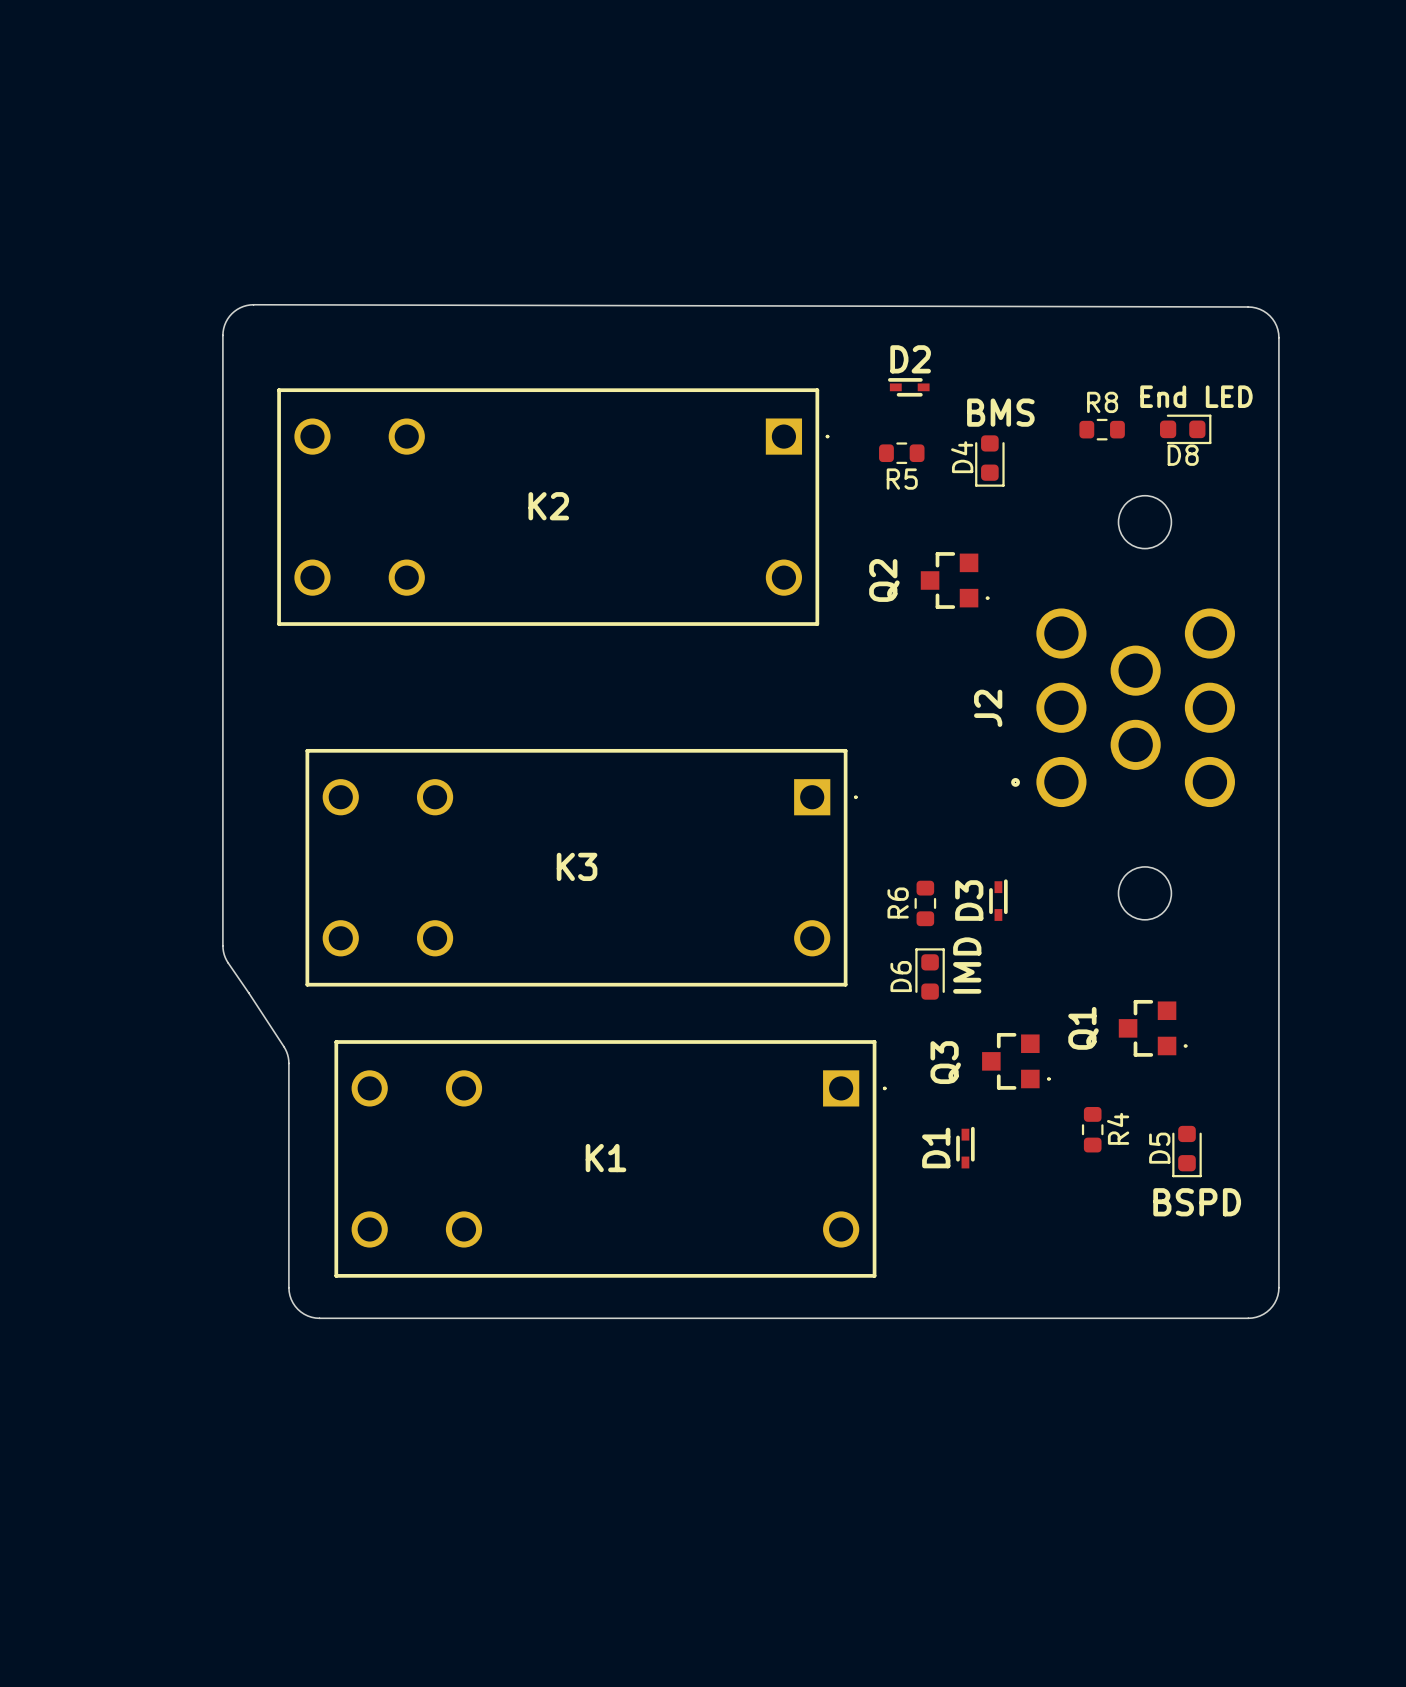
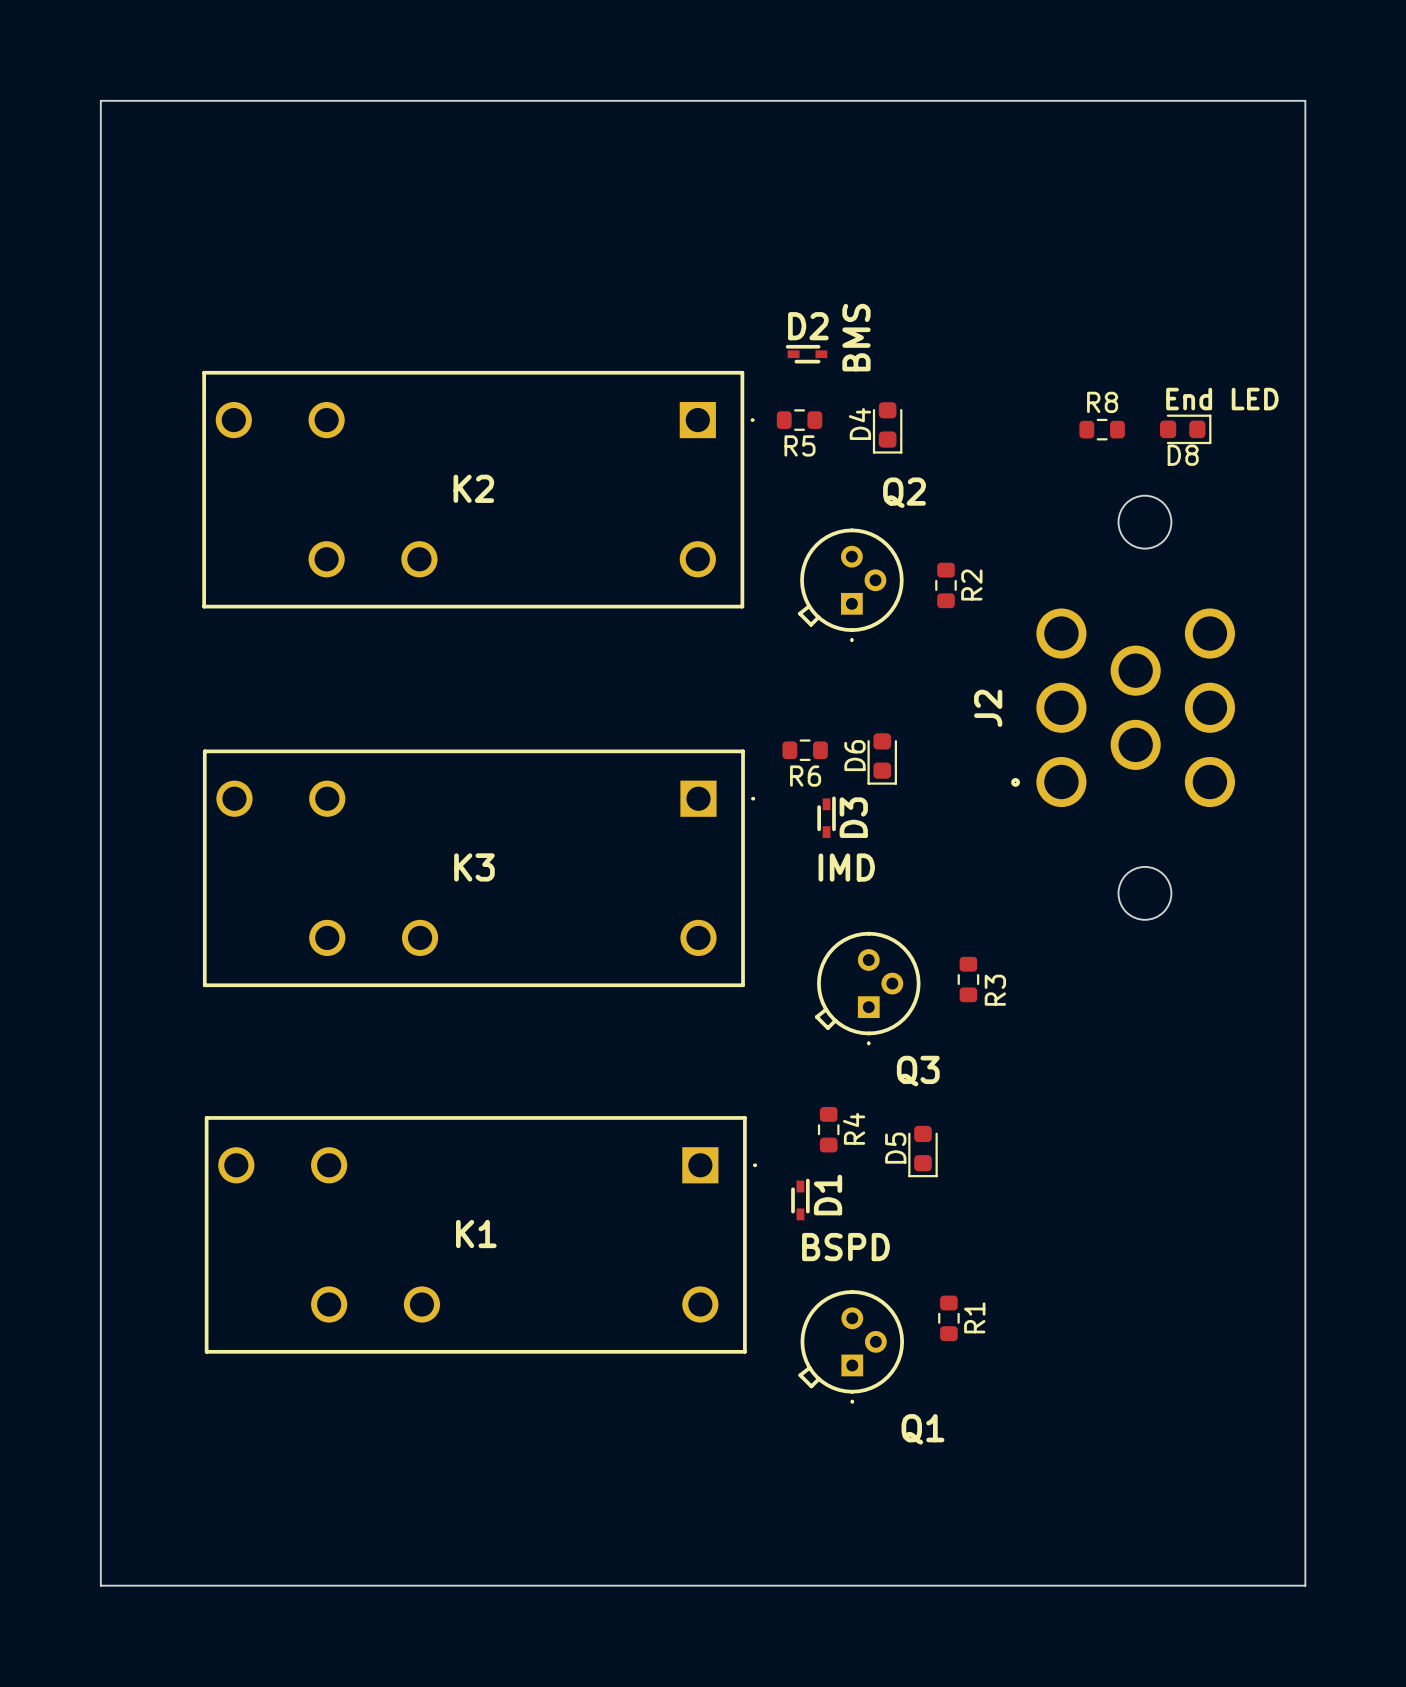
board edge: (253, 304) (1248, 306) (1260, 309) (1269, 315) (1276, 325) (1278, 337) (1278, 1287) (1276, 1299) (1269, 1309) (1260, 1315) (1248, 1318) (319, 1318) (307, 1315) (297, 1309) (291, 1299) (288, 1287) (288, 1057) (283, 1046) (226, 960) (222, 945) (222, 335) (225, 322) (231, 313) (240, 307) (253, 304) -> (100, 100) (100, 1585) (1305, 1585) (1305, 100) (100, 100)
D2 position: (908, 387) -> (806, 354)
K2 footprint: [277, 388, 830, 626] -> [202, 370, 755, 609]
text position: End LED (1196, 396) -> End LED (1222, 399)
text rotation: 0° (1000, 412) -> 90° counterclockwise (856, 337)
text position: BMS (1000, 412) -> BMS (856, 337)
R5 position: (901, 453) -> (799, 420)
D4 position: (989, 461) -> (887, 427)
Q2 footprint: [920, 552, 990, 609] -> [798, 528, 904, 642]
Q2 name position: Q2 (884, 580) -> Q2 (904, 492)
R2: none -> (945, 585)
K3 footprint: [305, 748, 858, 987] -> [202, 749, 756, 988]
D3 name position: D3 (969, 900) -> D3 (853, 817)
D3 position: (998, 900) -> (826, 817)
R6 name position: R6 (898, 902) -> R6 (805, 776)
R6 rotation: 0° (925, 903) -> 90° clockwise (805, 750)
R6 position: (925, 903) -> (805, 750)
text rotation: 0° (967, 965) -> 90° clockwise (846, 867)
text position: IMD (967, 965) -> IMD (846, 867)
D6 rotation: 0° (930, 974) -> 180° (882, 758)
D6 position: (930, 974) -> (882, 758)
R3: none -> (968, 979)
Q1 footprint: [1118, 999, 1188, 1057] -> [798, 1290, 905, 1404]
Q1 name position: Q1 (1083, 1028) -> Q1 (922, 1429)
Q3 footprint: [982, 1032, 1051, 1090] -> [814, 931, 921, 1046]
K1 footprint: [334, 1040, 887, 1278] -> [204, 1116, 757, 1354]
Q3 name position: Q3 (945, 1062) -> Q3 (918, 1071)
R4 position: (1092, 1129) -> (828, 1129)
D1 position: (965, 1147) -> (800, 1199)
D1 name position: D1 (936, 1148) -> D1 (828, 1195)
D5 position: (1187, 1151) -> (922, 1151)
text position: BSPD (1197, 1202) -> BSPD (845, 1247)
R1: none -> (948, 1318)

